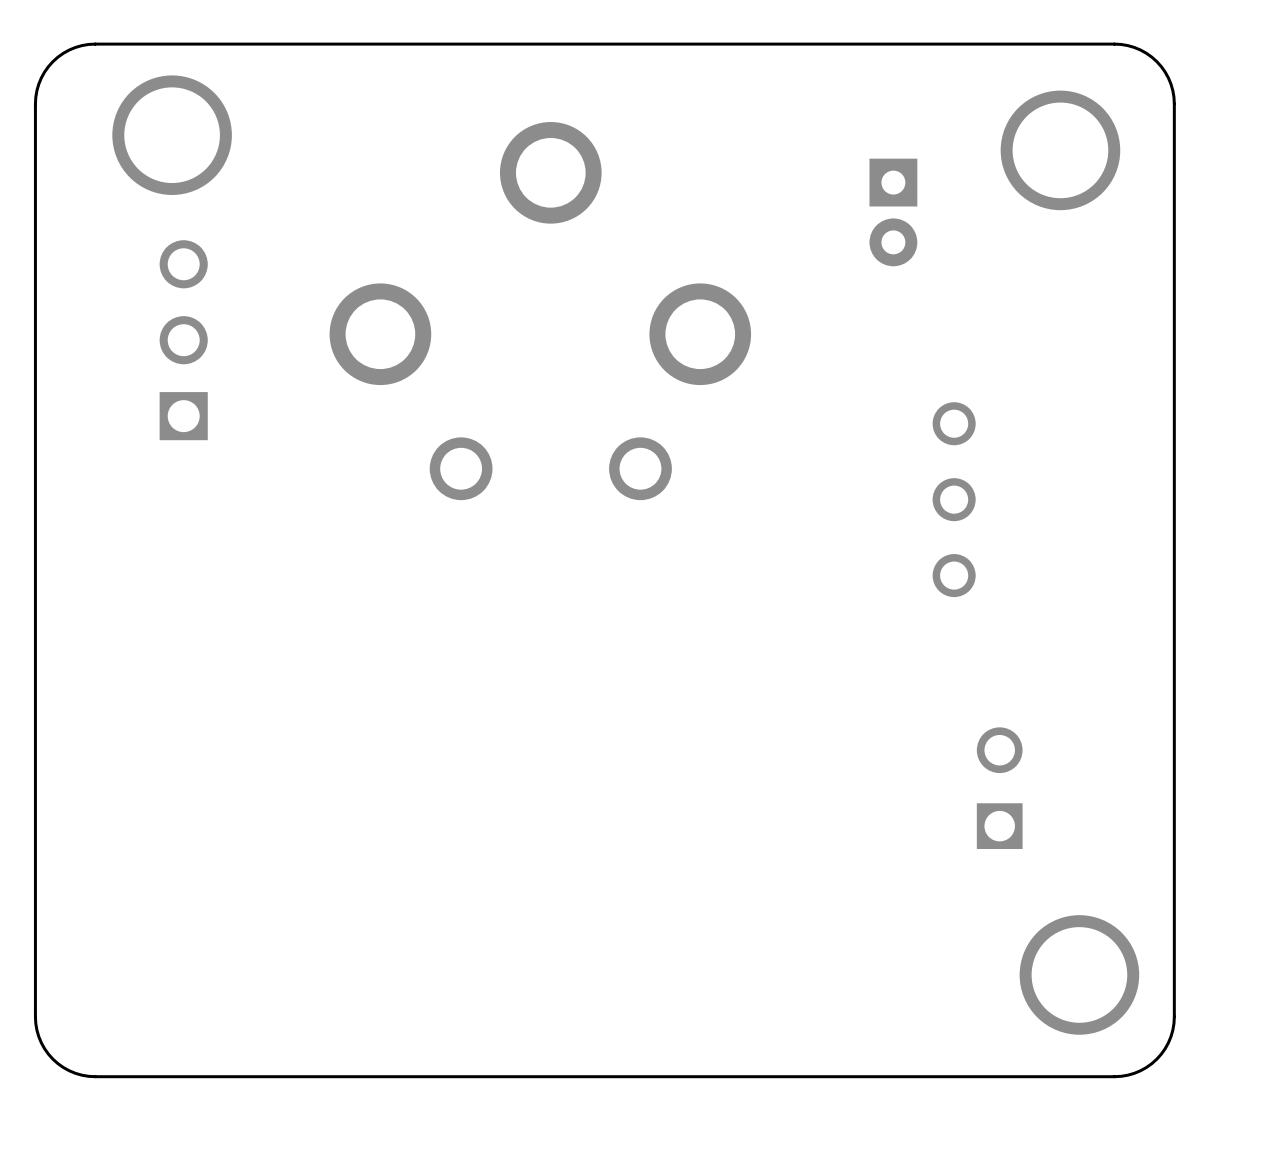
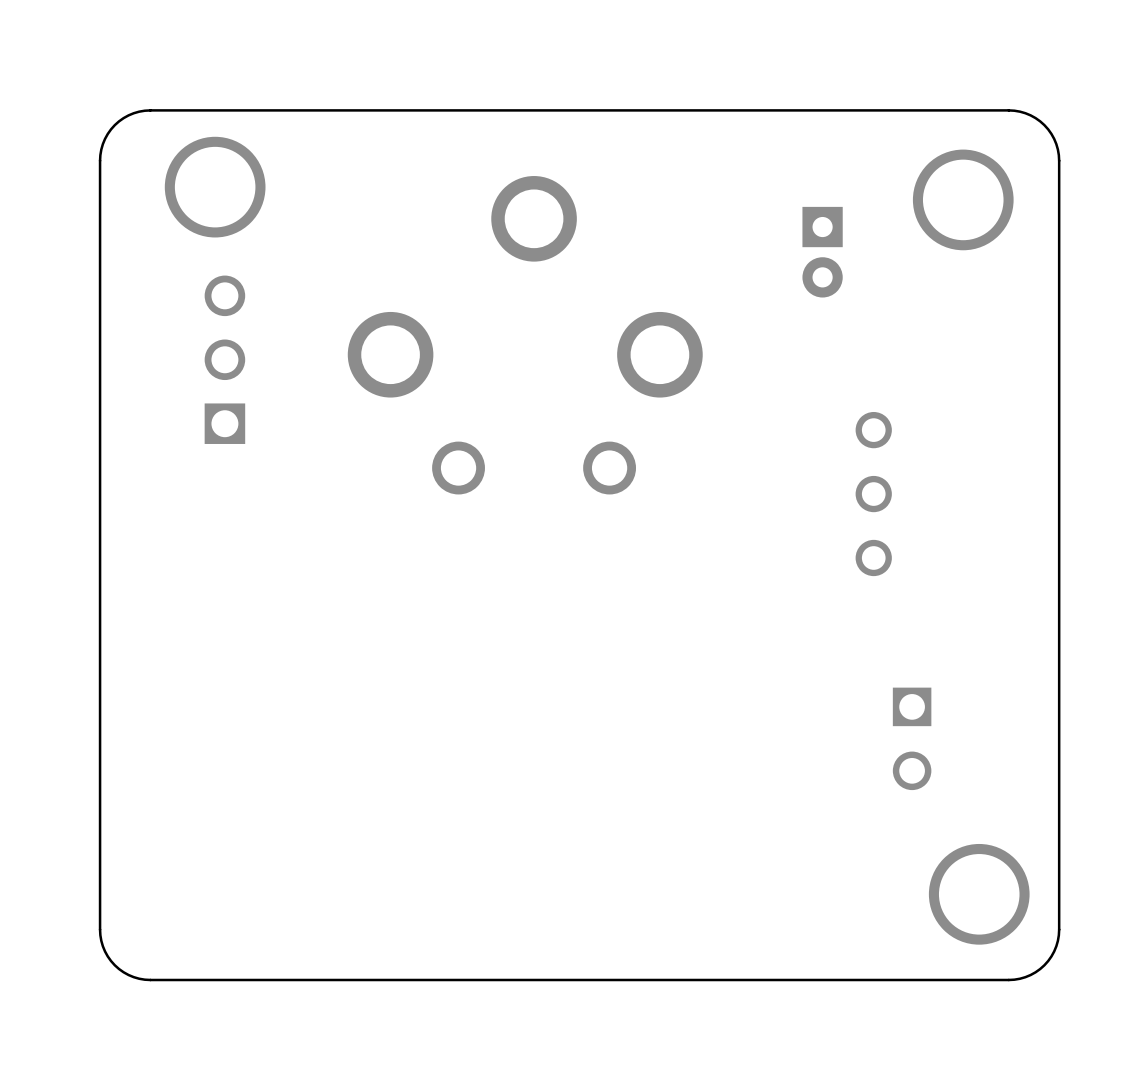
part rotation: 0° (999, 788) -> 180° (912, 738)

